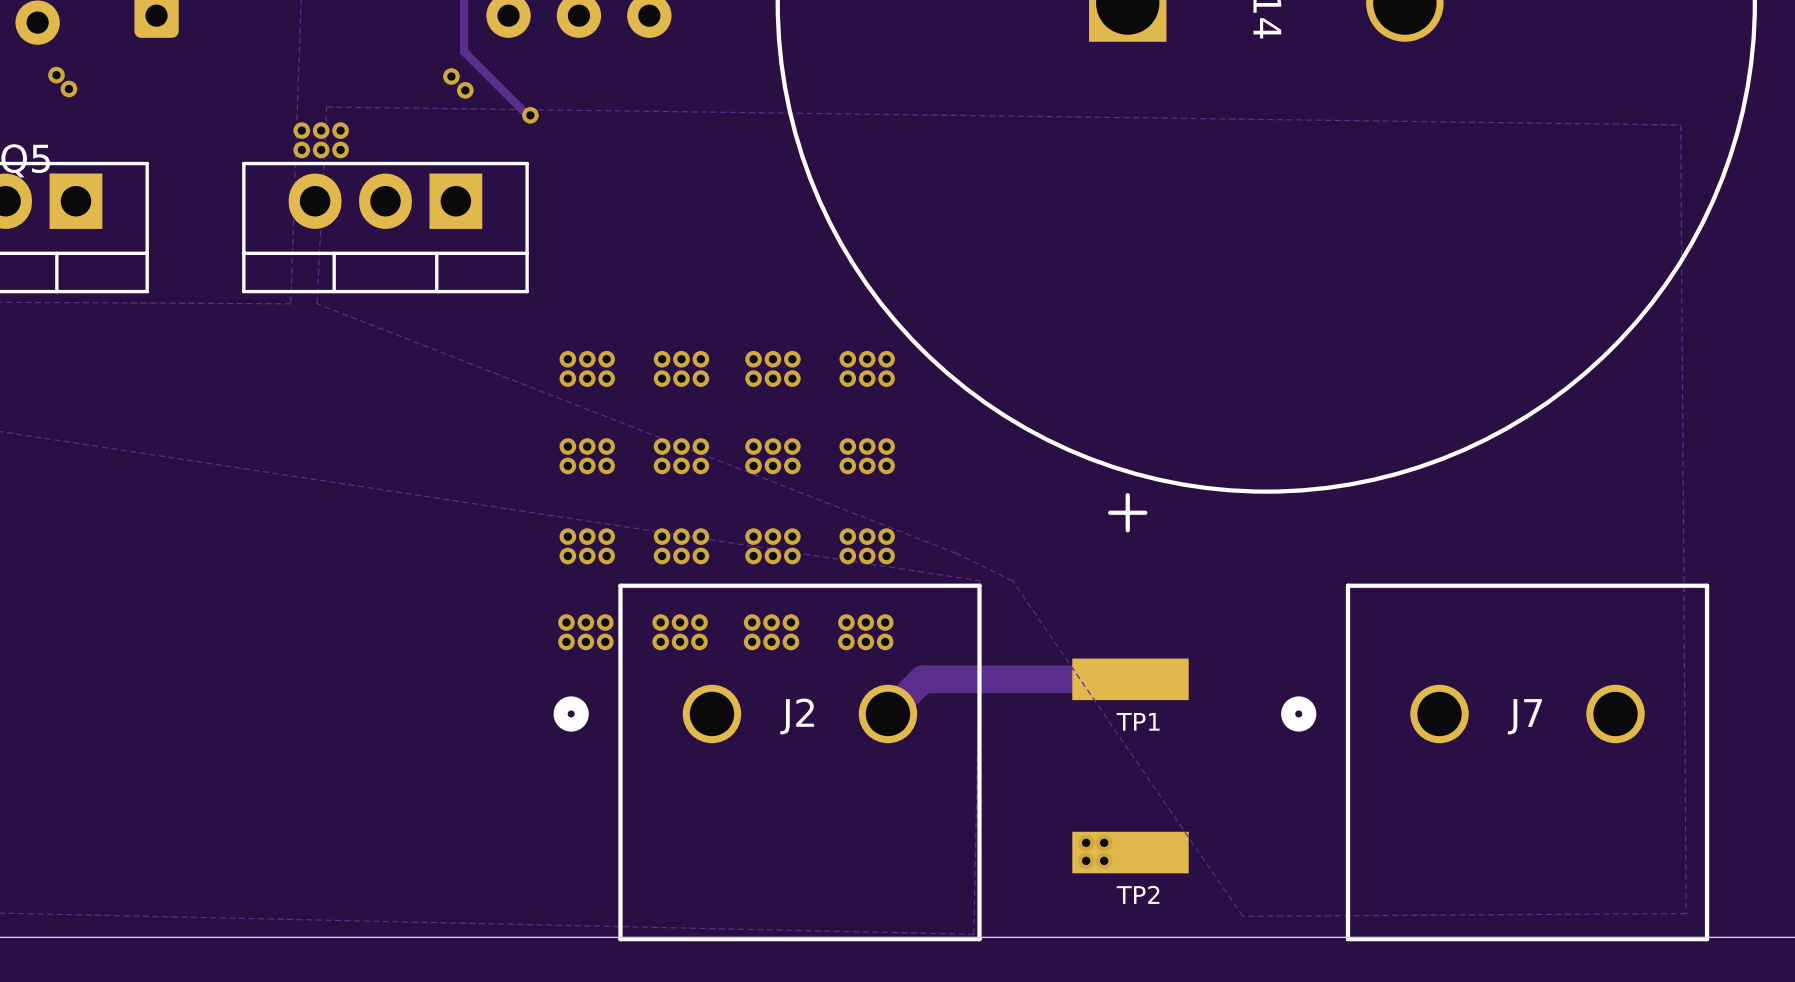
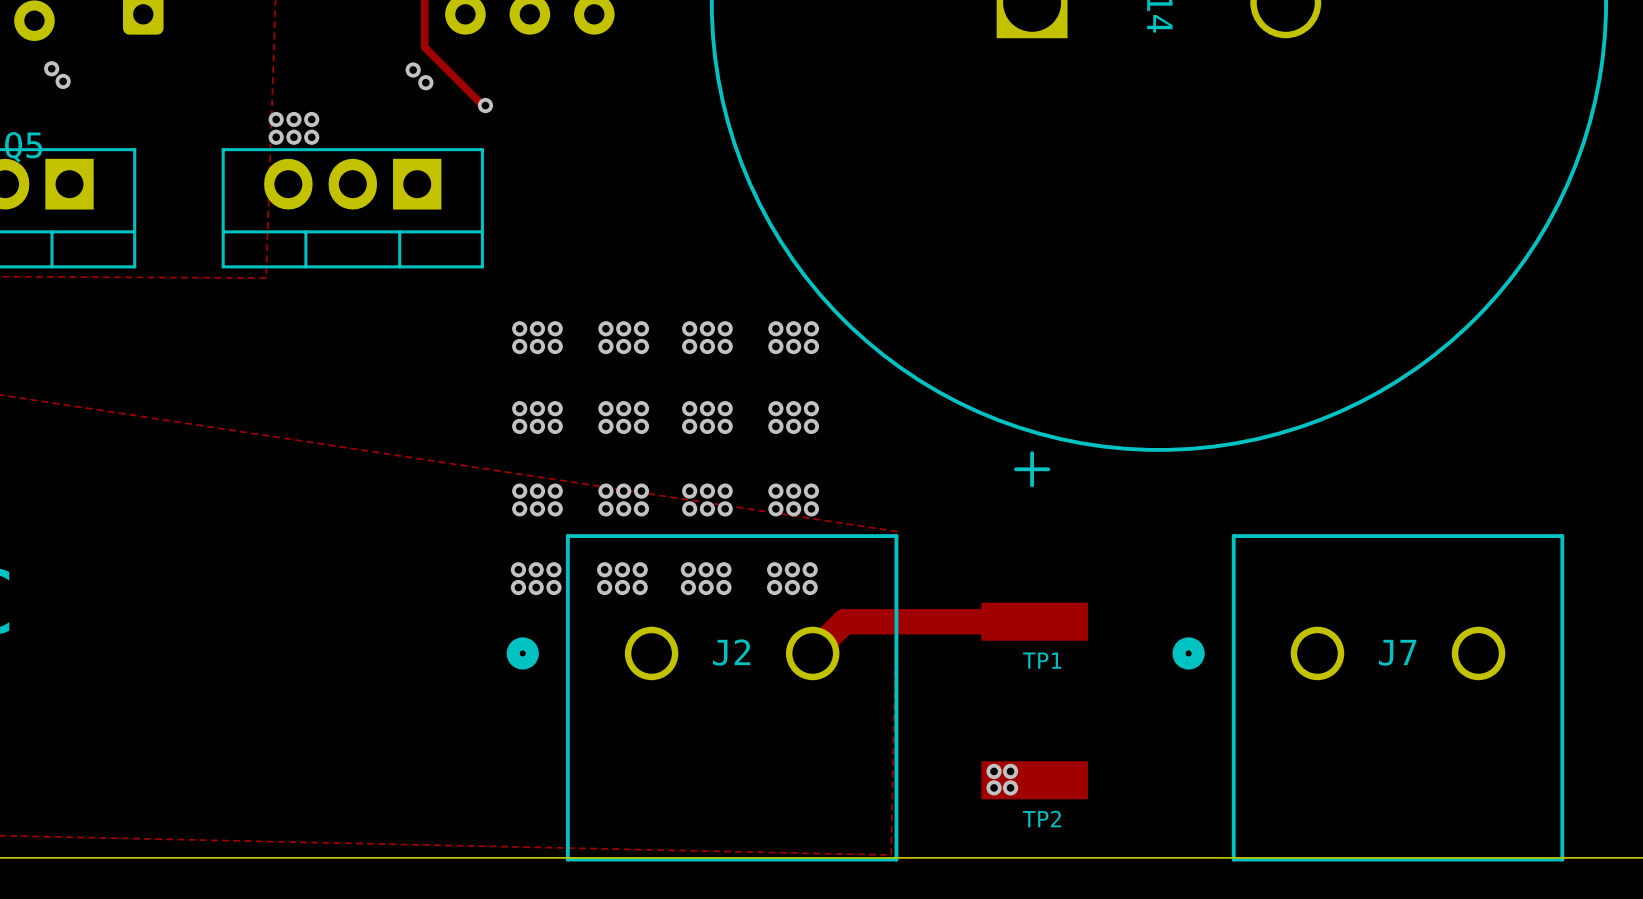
zone outline: (326, 107) (317, 303) (955, 553) (1012, 580) (1242, 916) (1686, 913) (1680, 125) (326, 107) -> none

